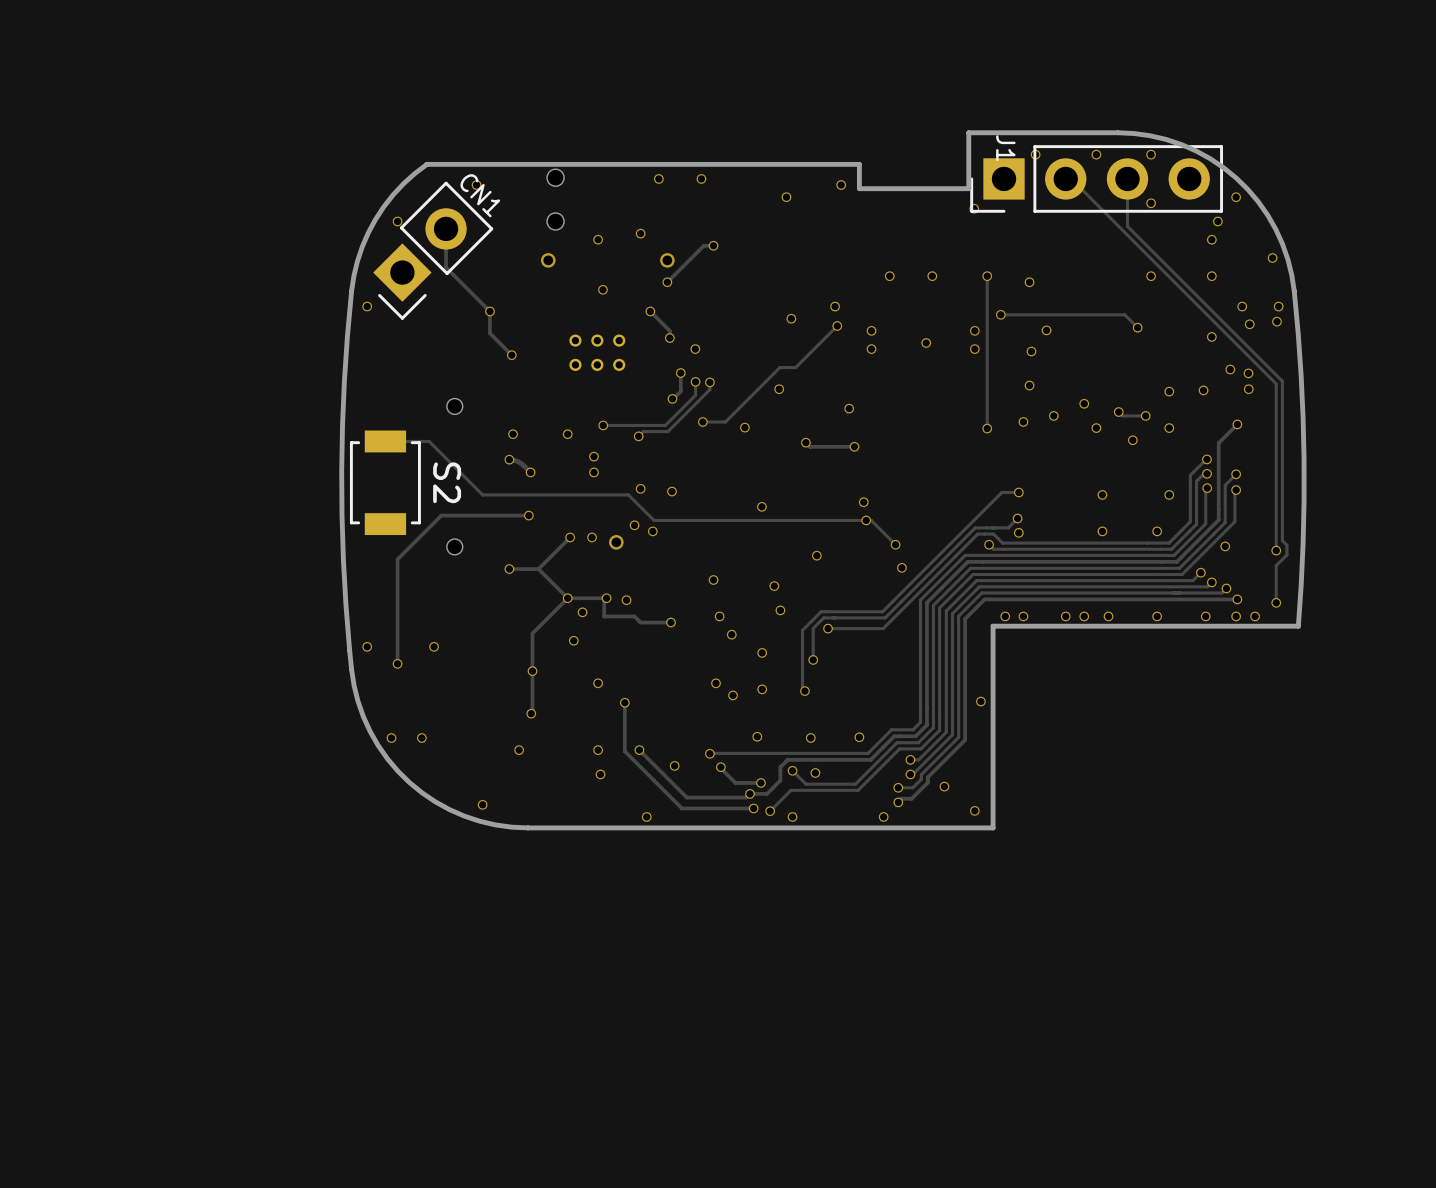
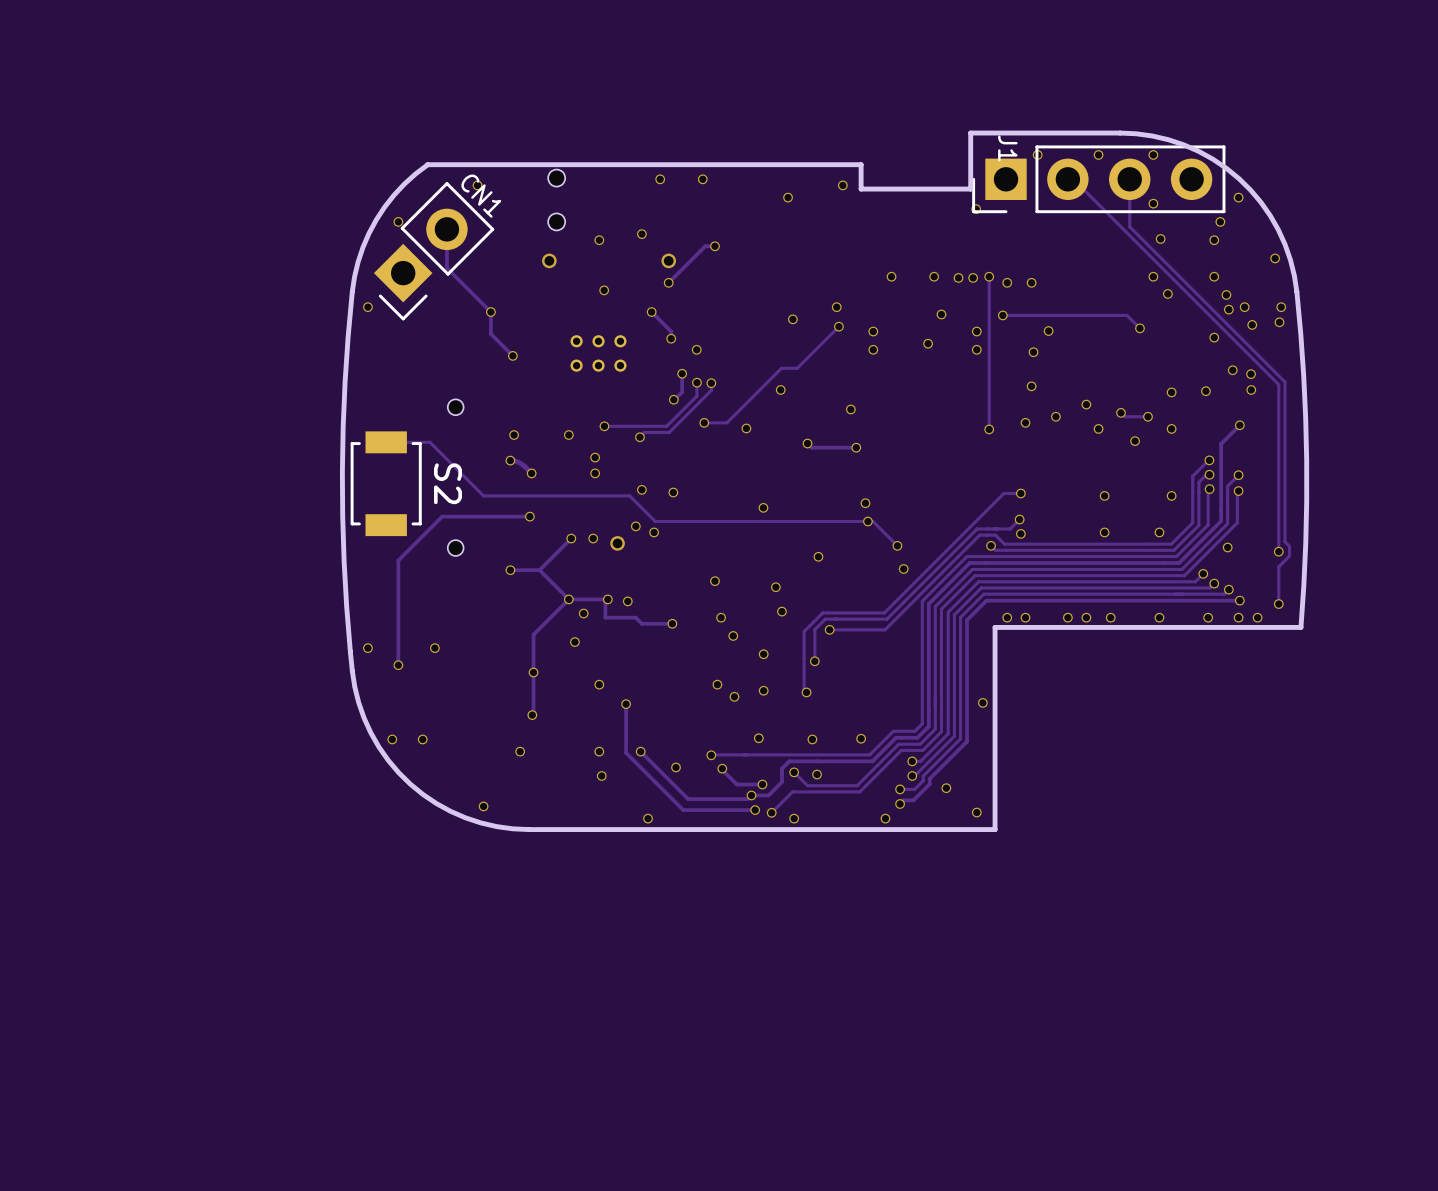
via: none -> (1160, 238)
via: none -> (958, 277)
via: none -> (973, 277)
via: none -> (1007, 282)
via: none -> (1167, 293)
via: none -> (1226, 294)
via: none -> (1228, 309)
via: none -> (941, 314)

